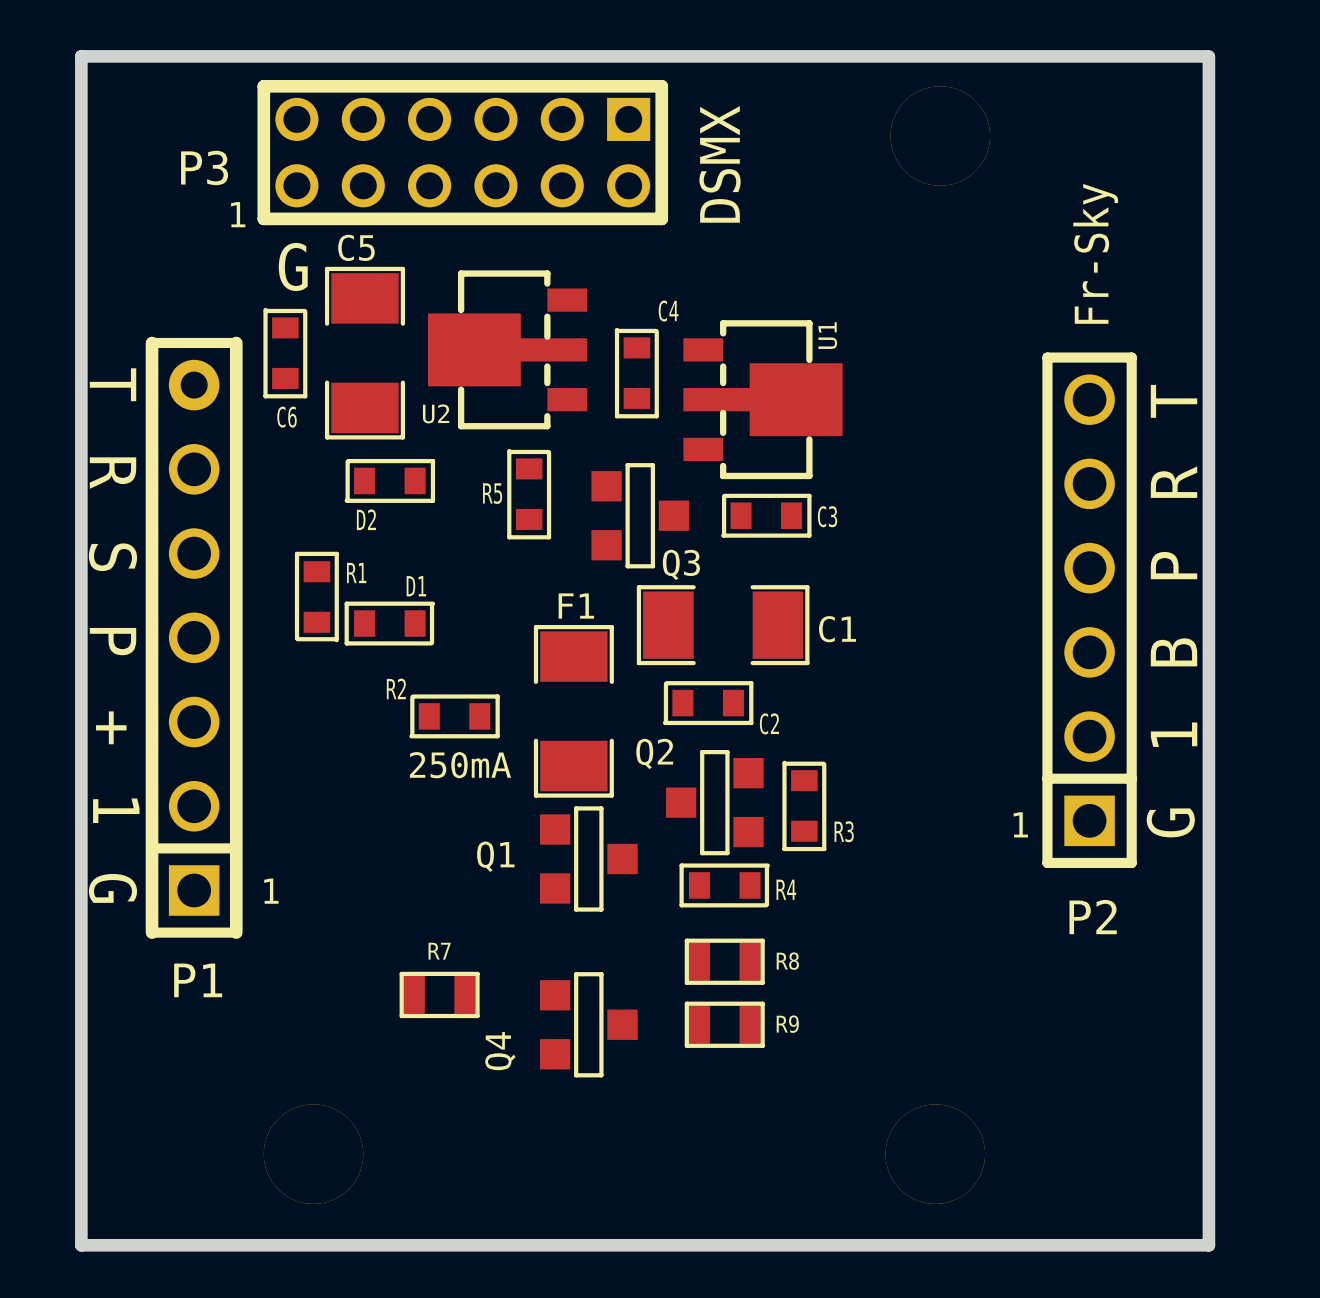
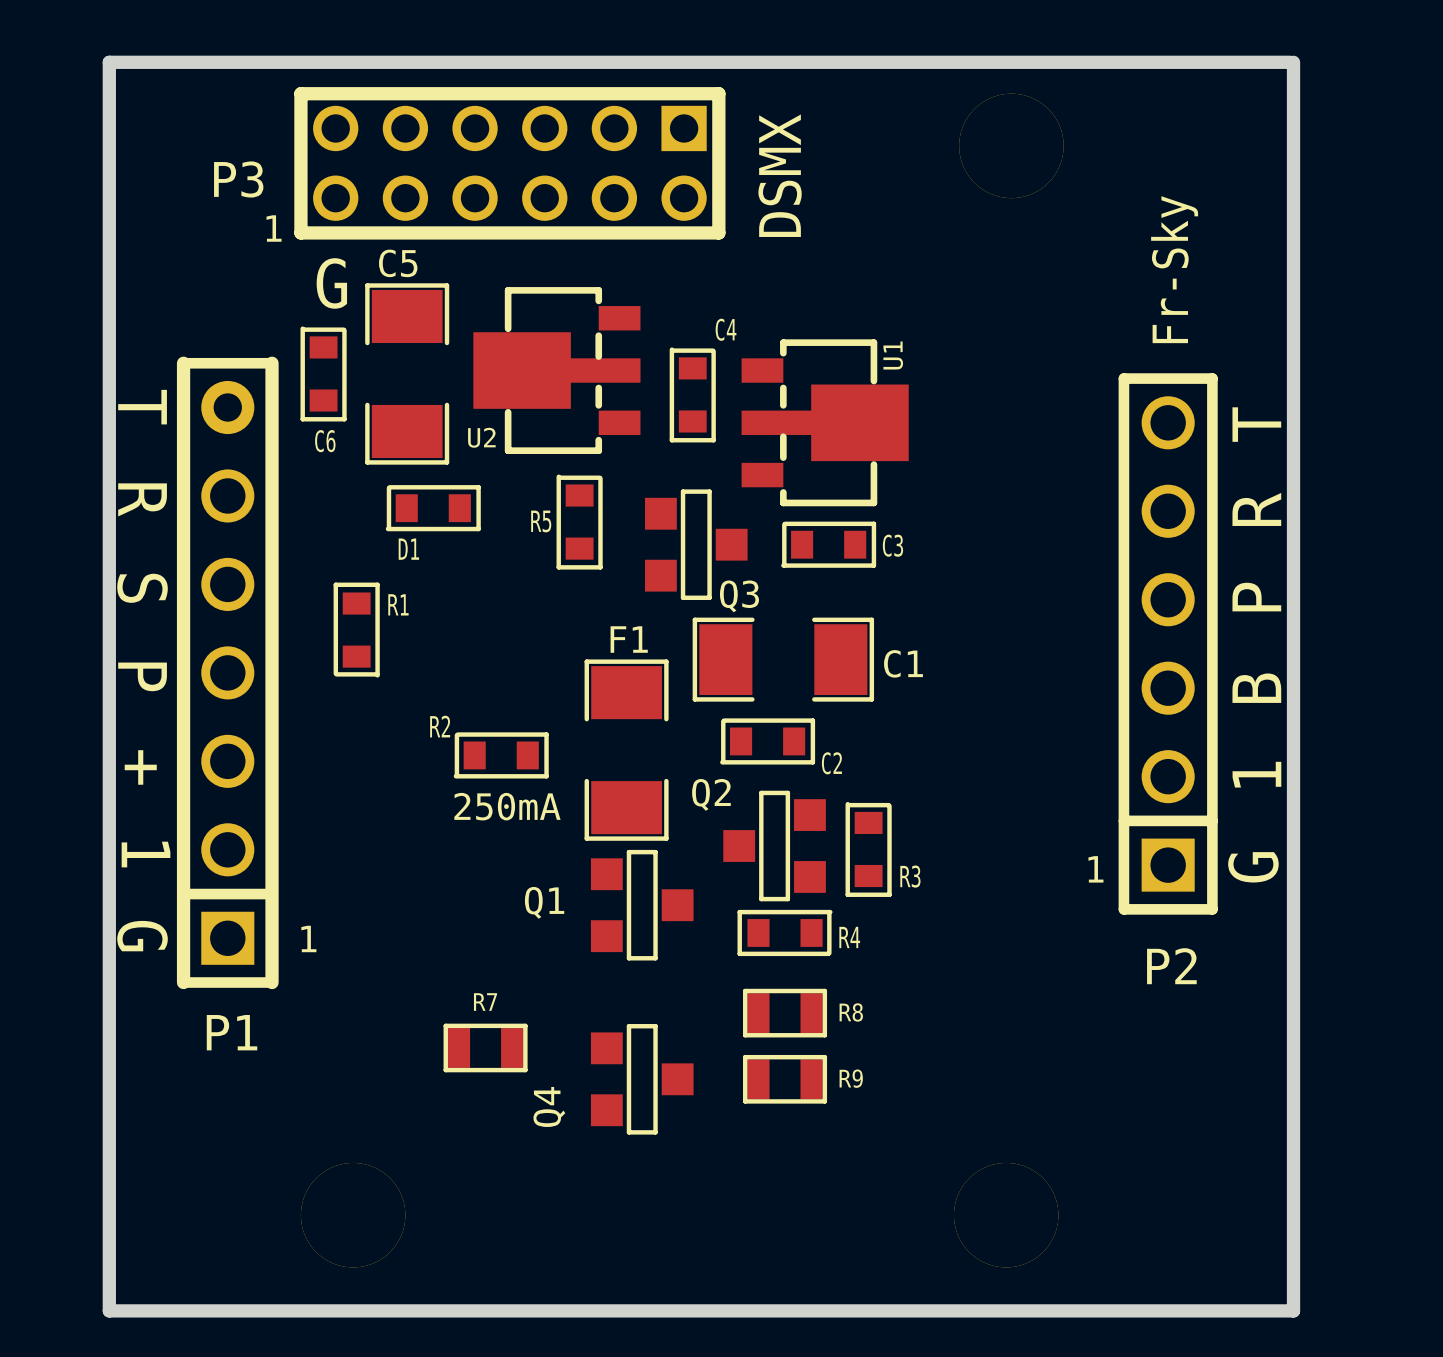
D2 name: D2 (366, 519) -> D1 (408, 549)
D1: (389, 623) -> none

